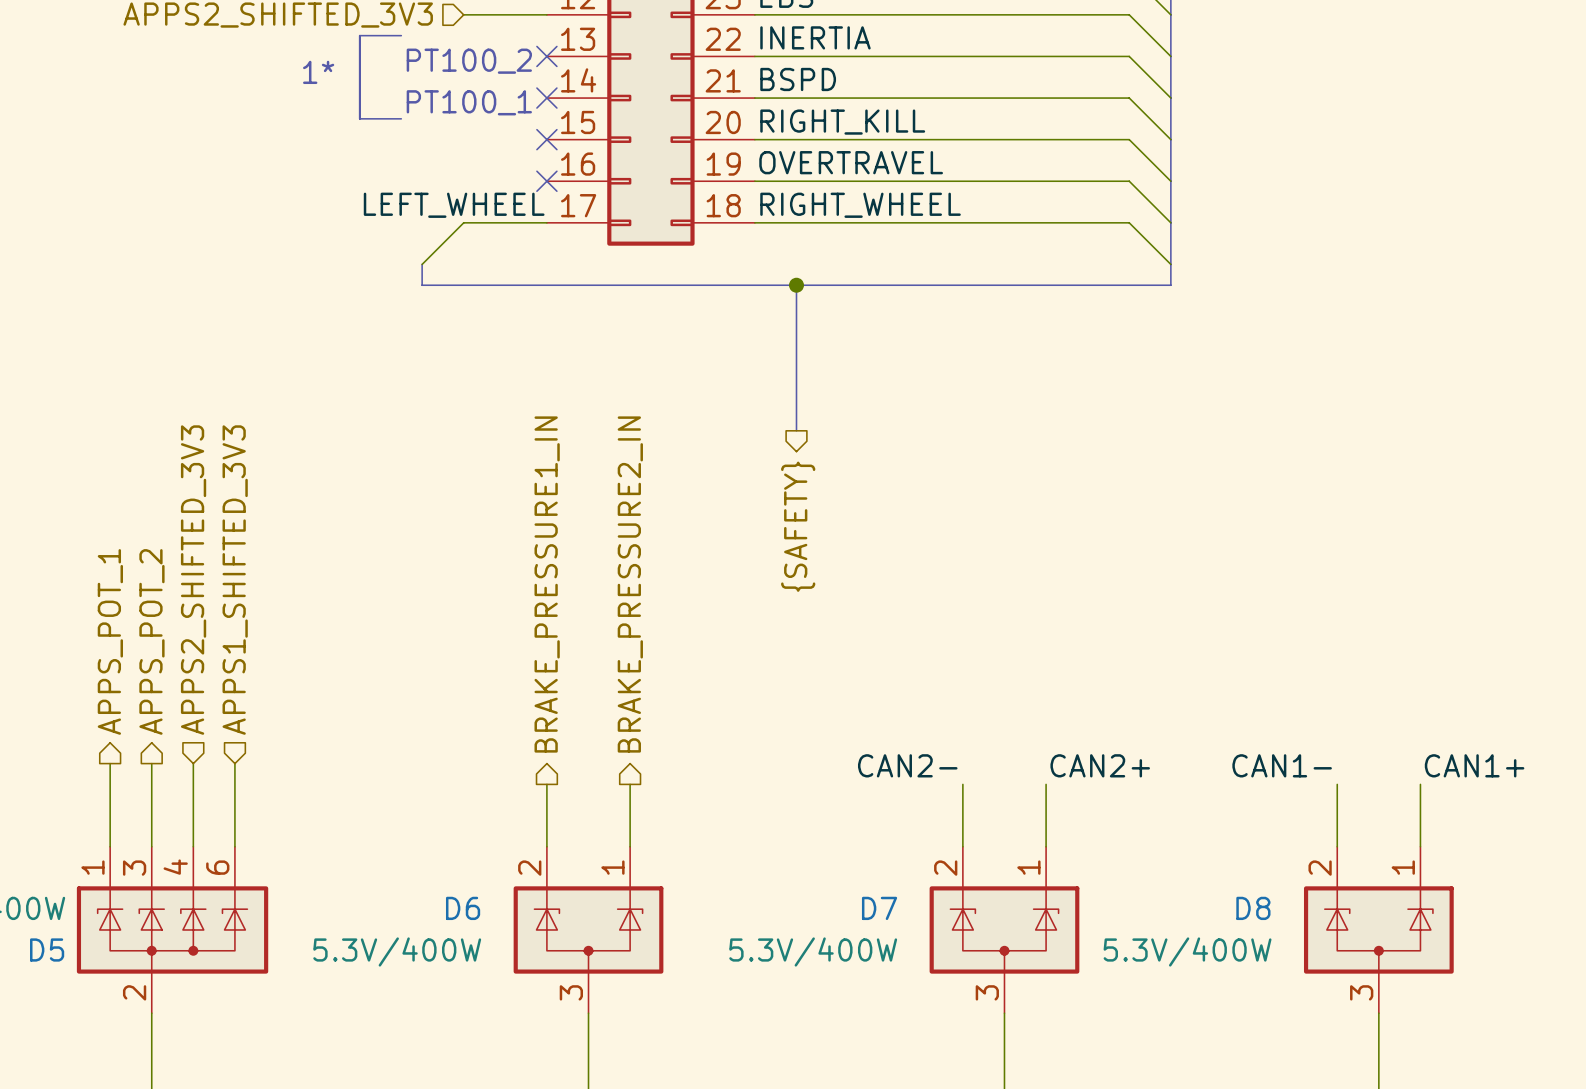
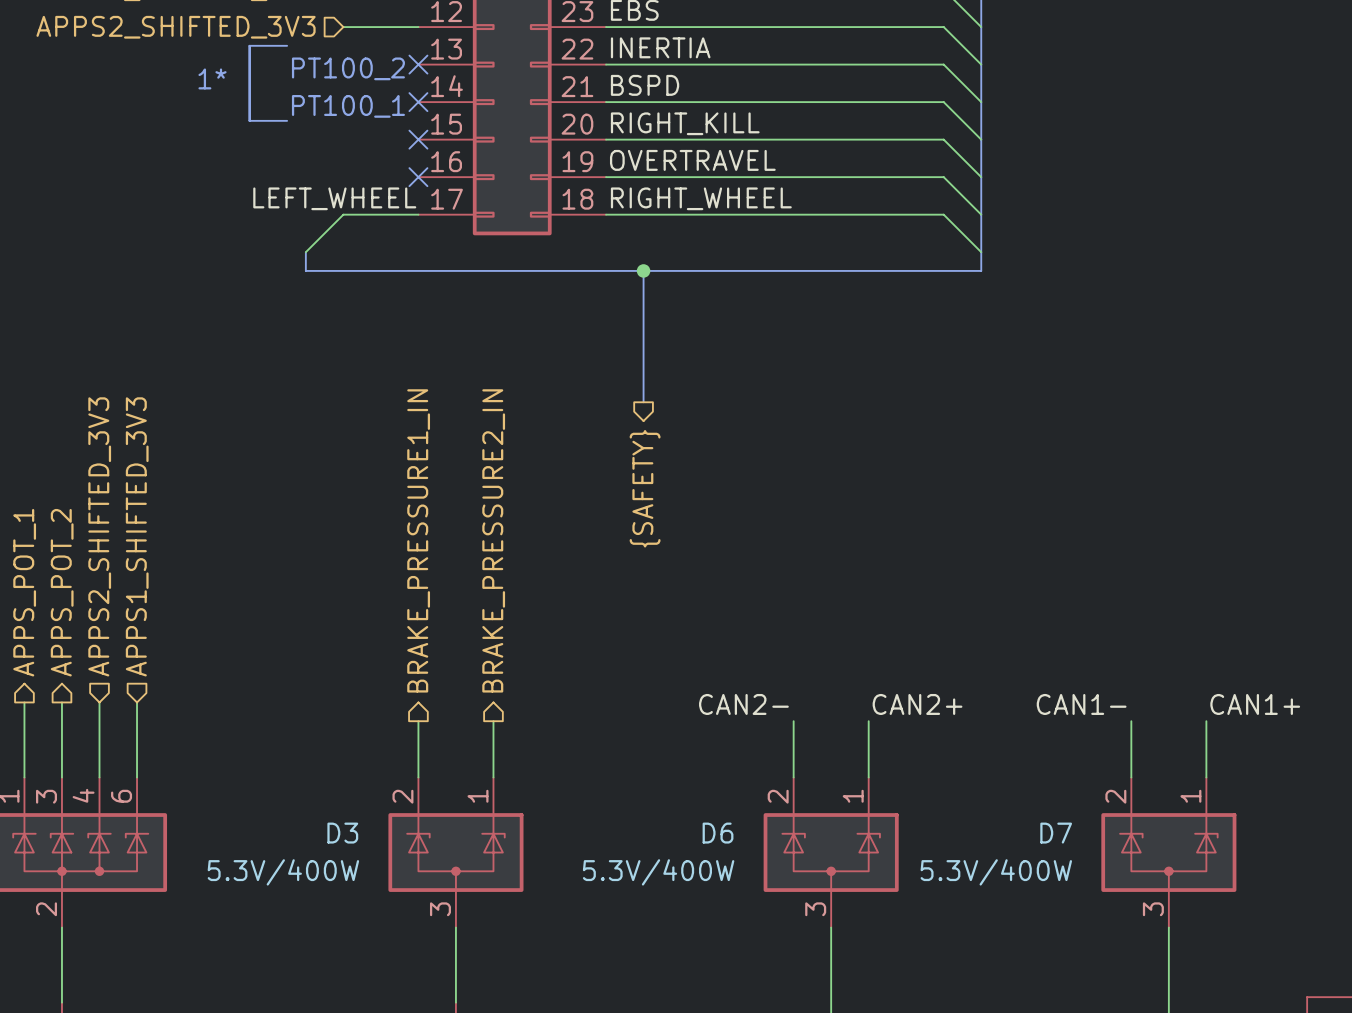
D6 name: D6 (463, 908) -> D3 (342, 833)
D7 name: D7 (879, 908) -> D6 (718, 833)
D8 name: D8 (1253, 908) -> D7 (1056, 833)

